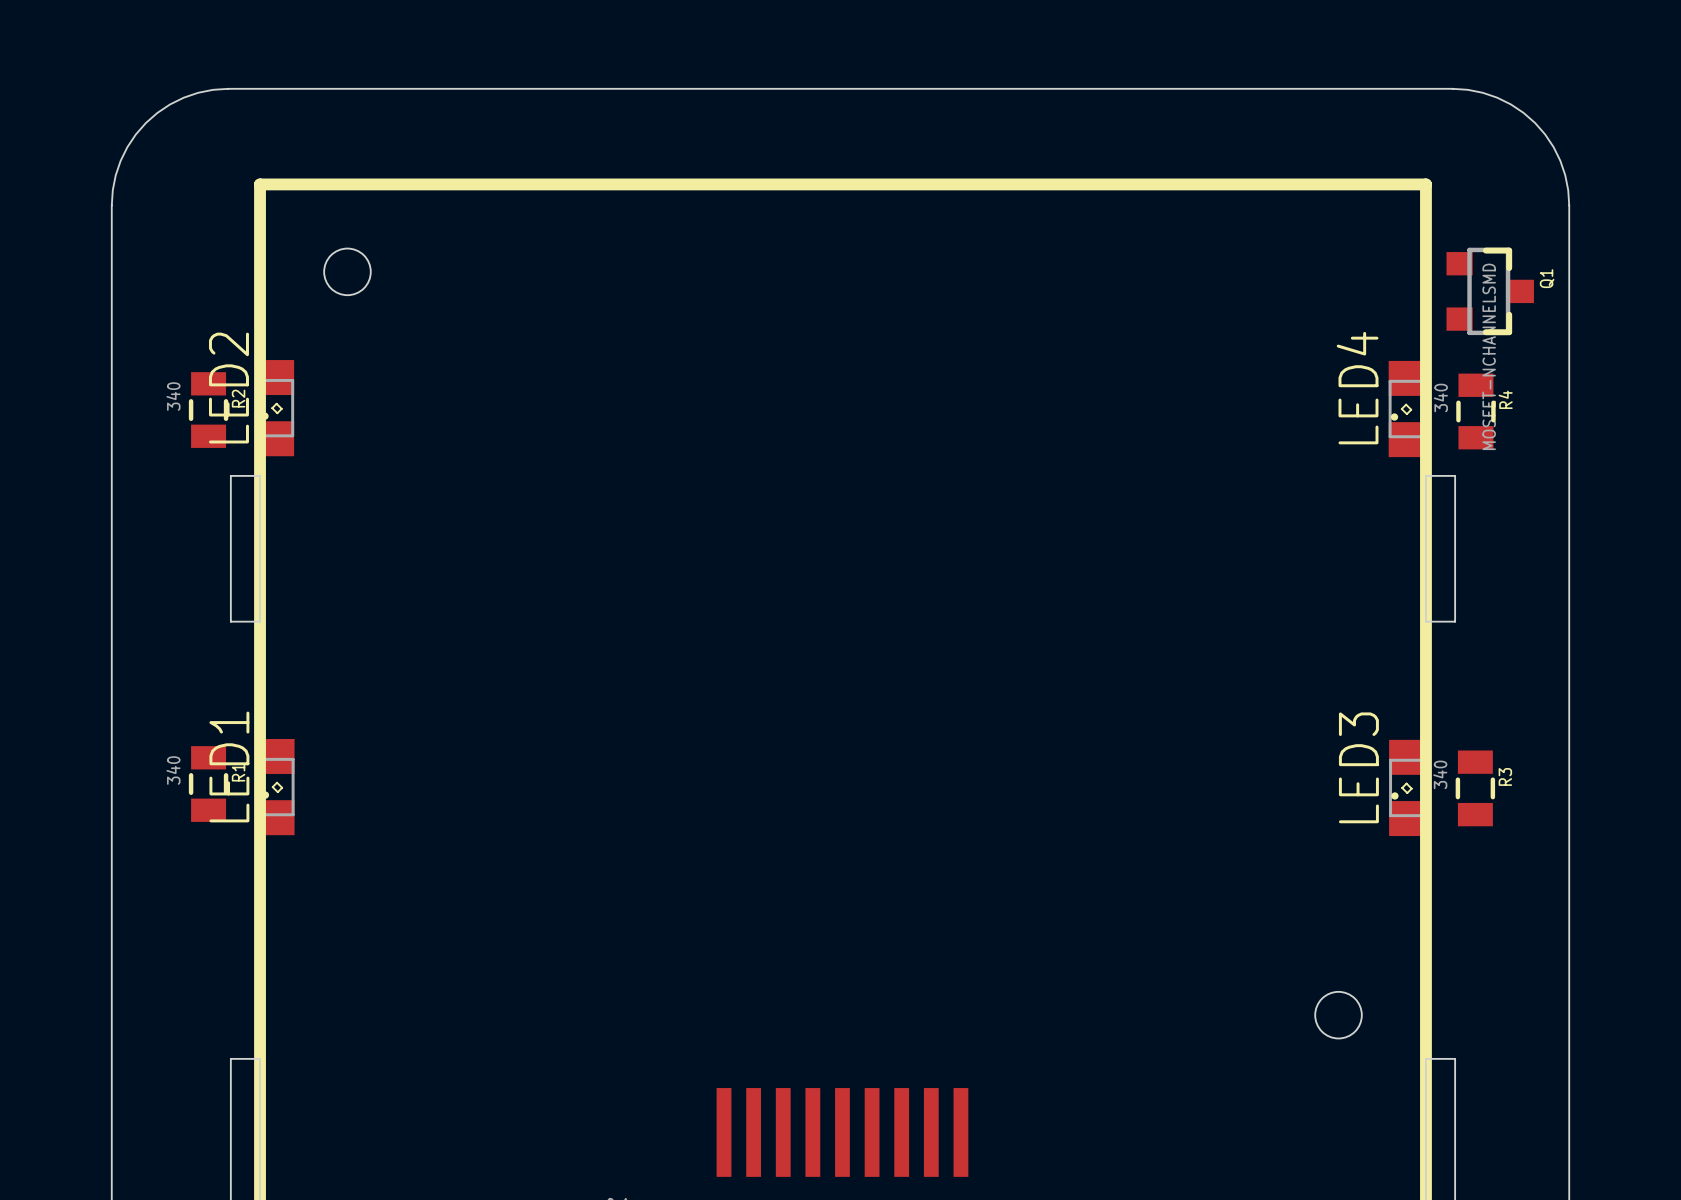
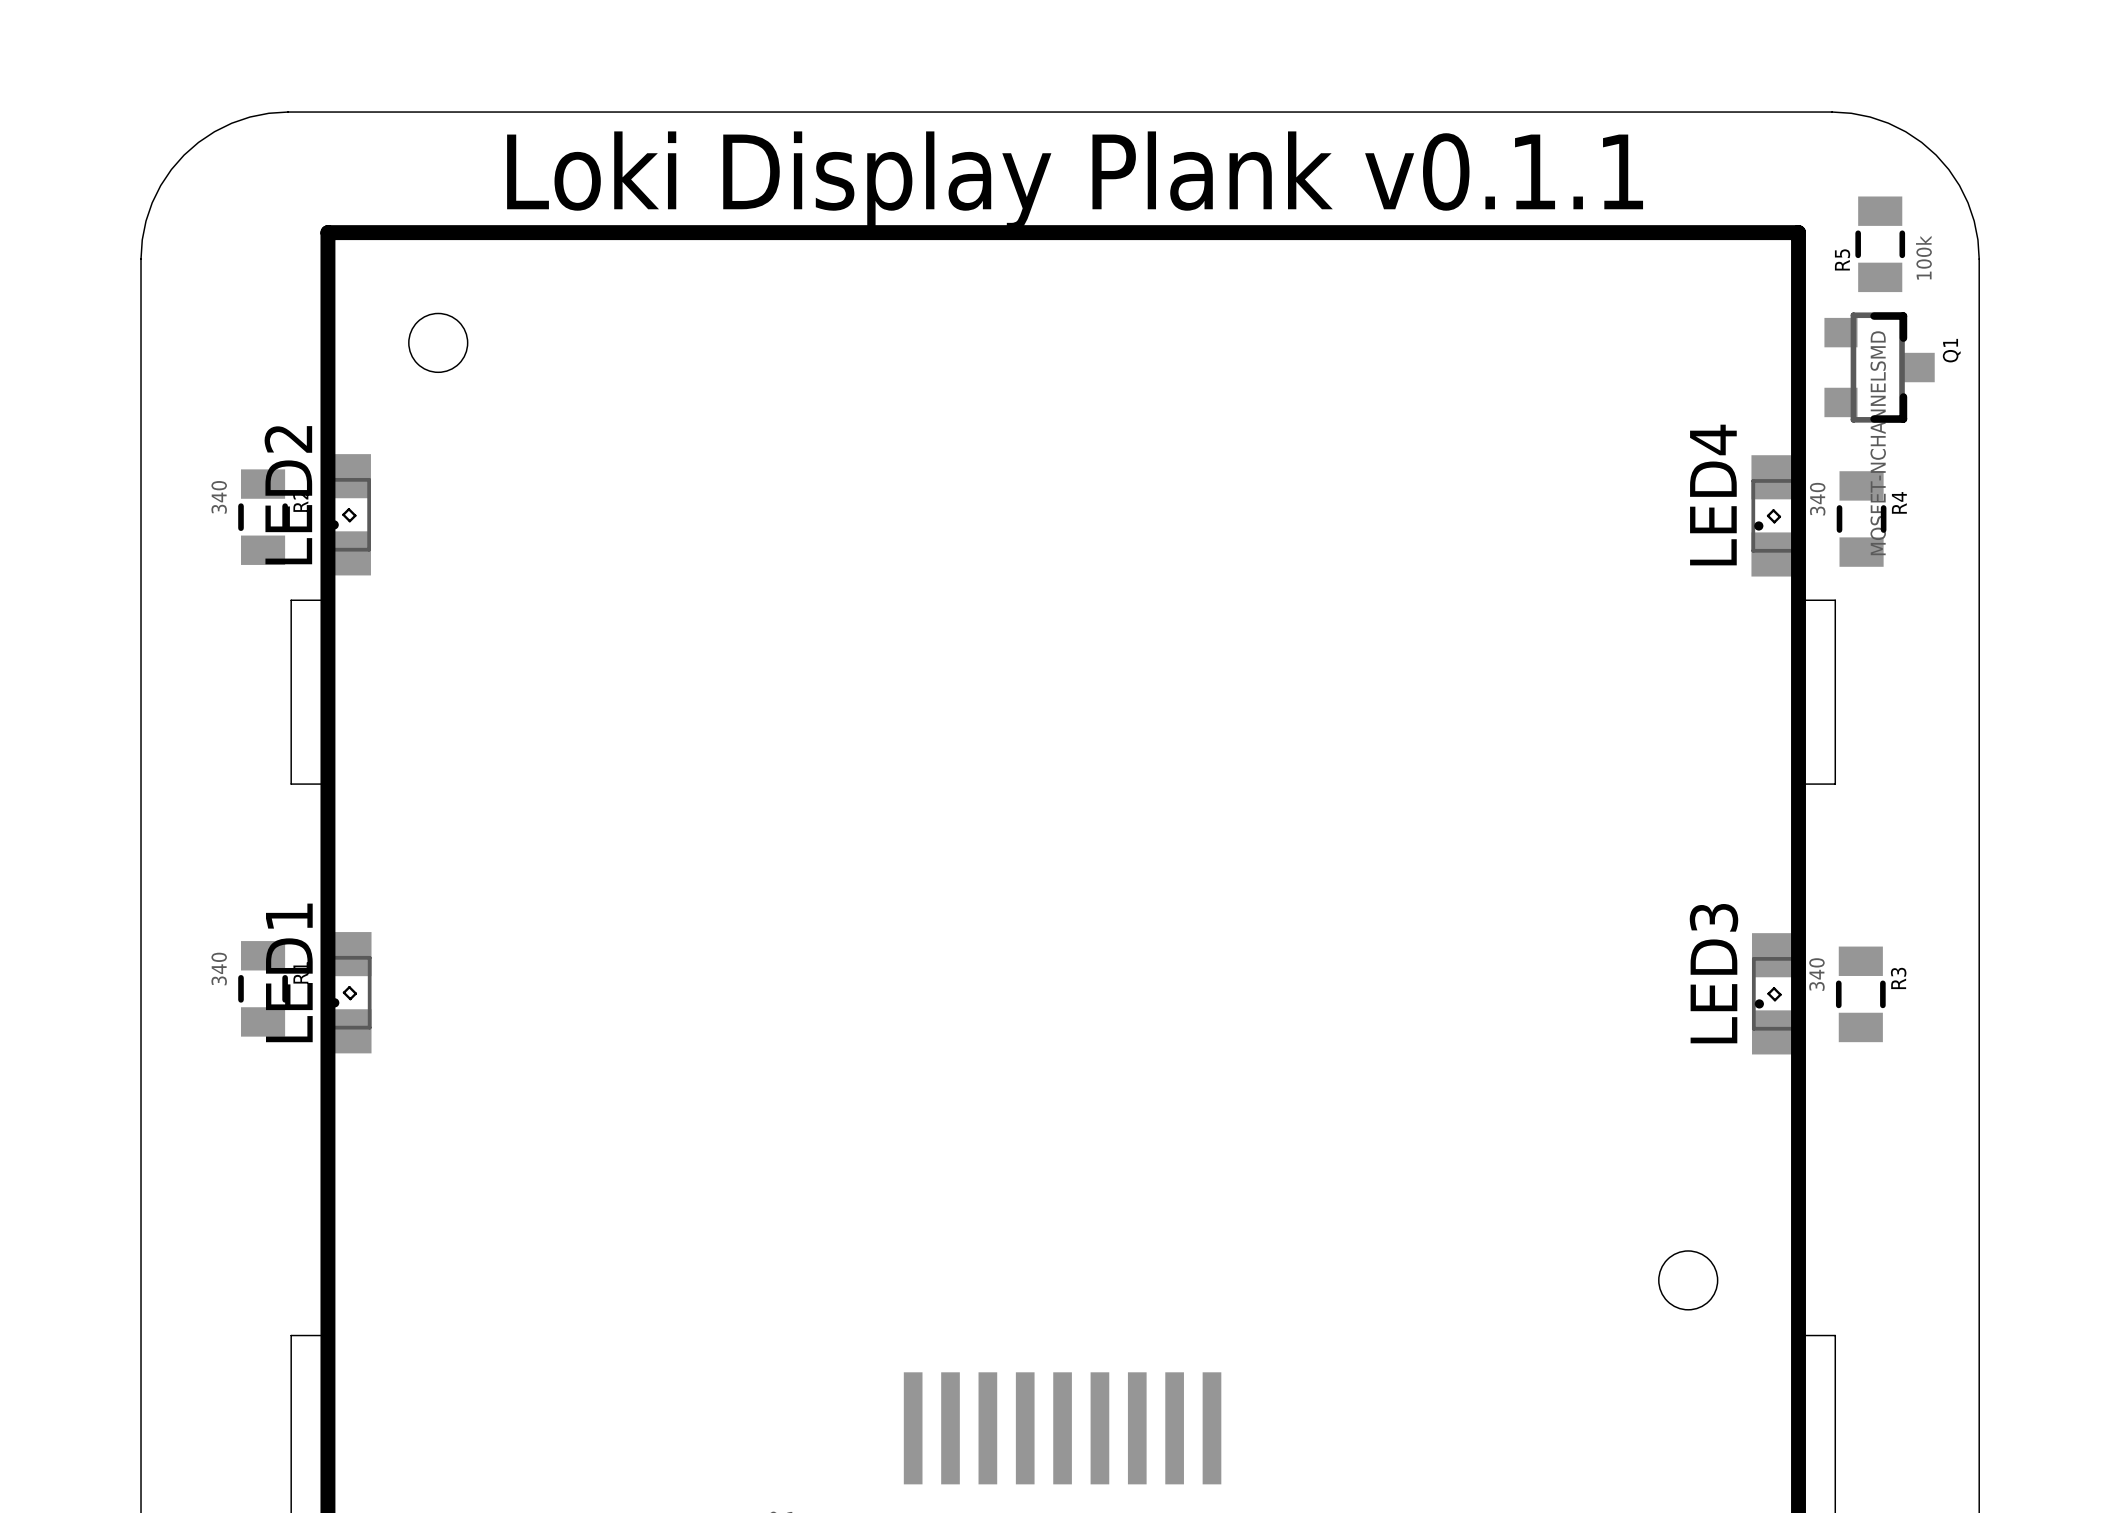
text: none -> Loki Display Plank v0.1.1 (1075, 180)
R5: none -> 100k (1880, 244)

